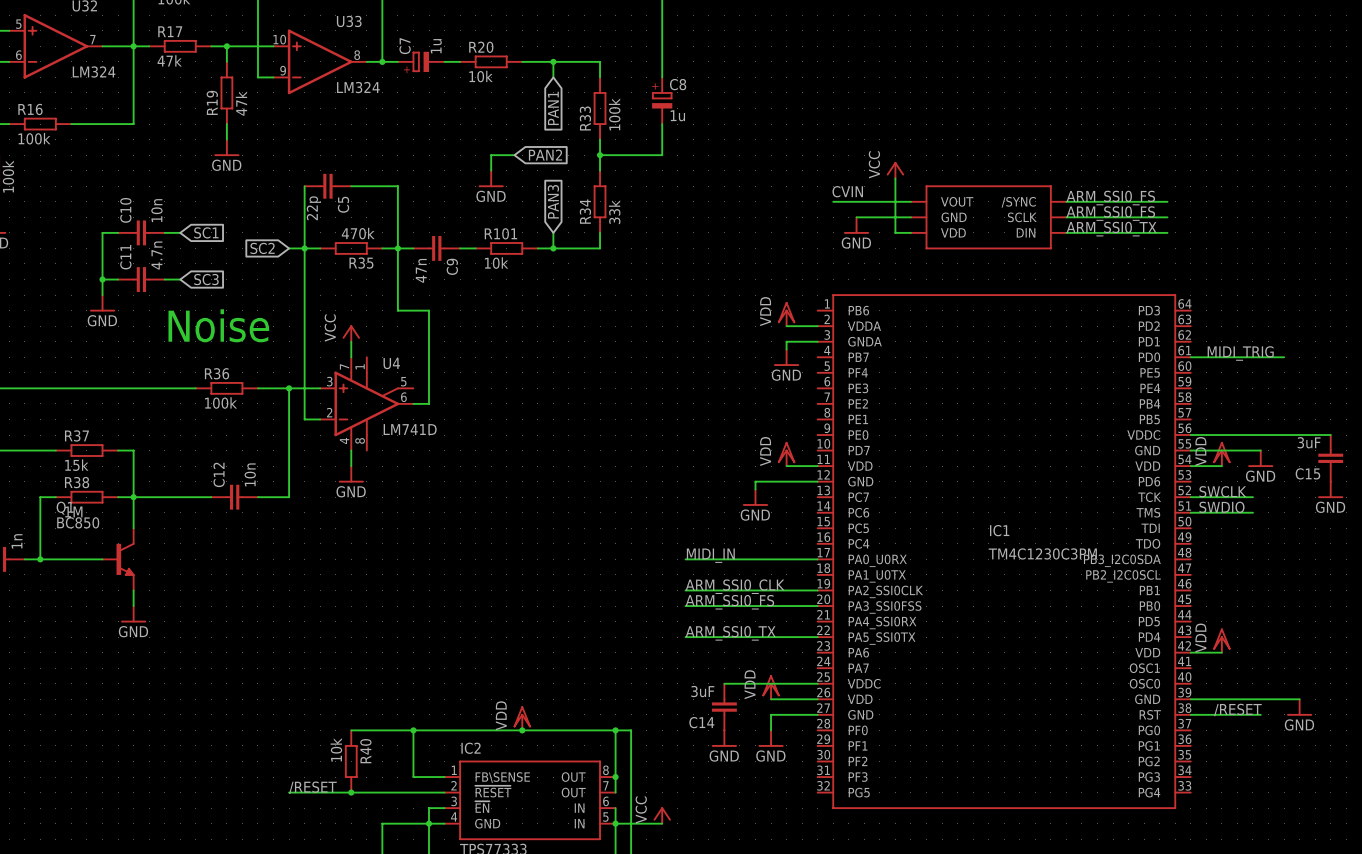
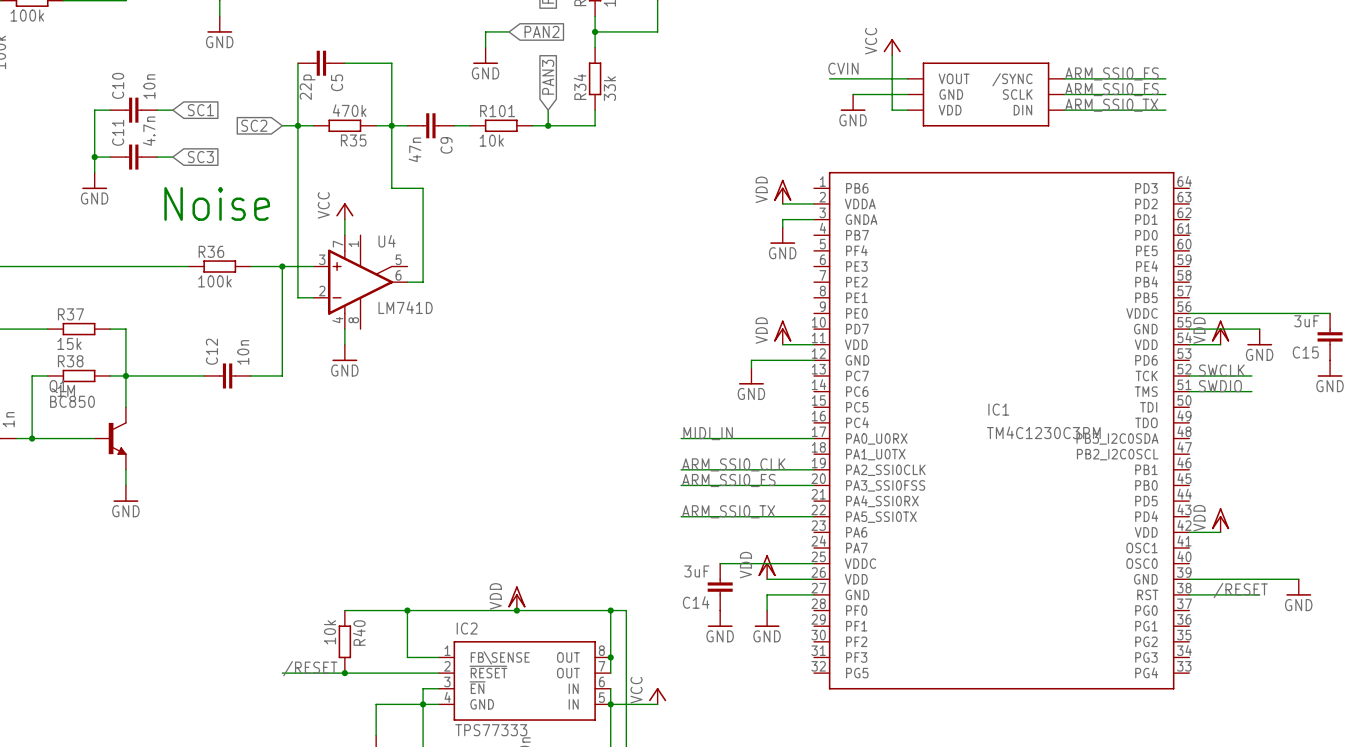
label: MIDI_TRIG (1240, 353) -> none
wire: (1190, 357) (1284, 357) -> none

